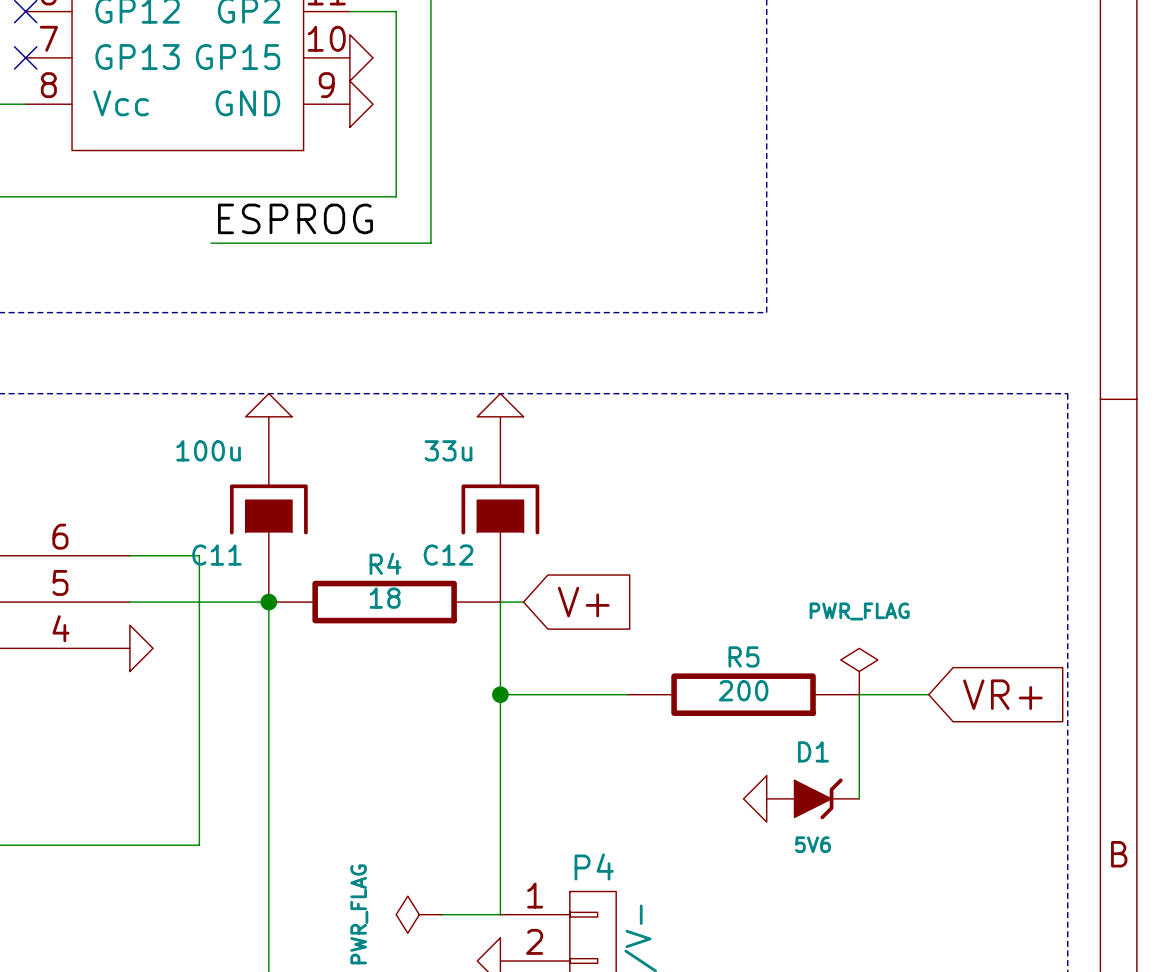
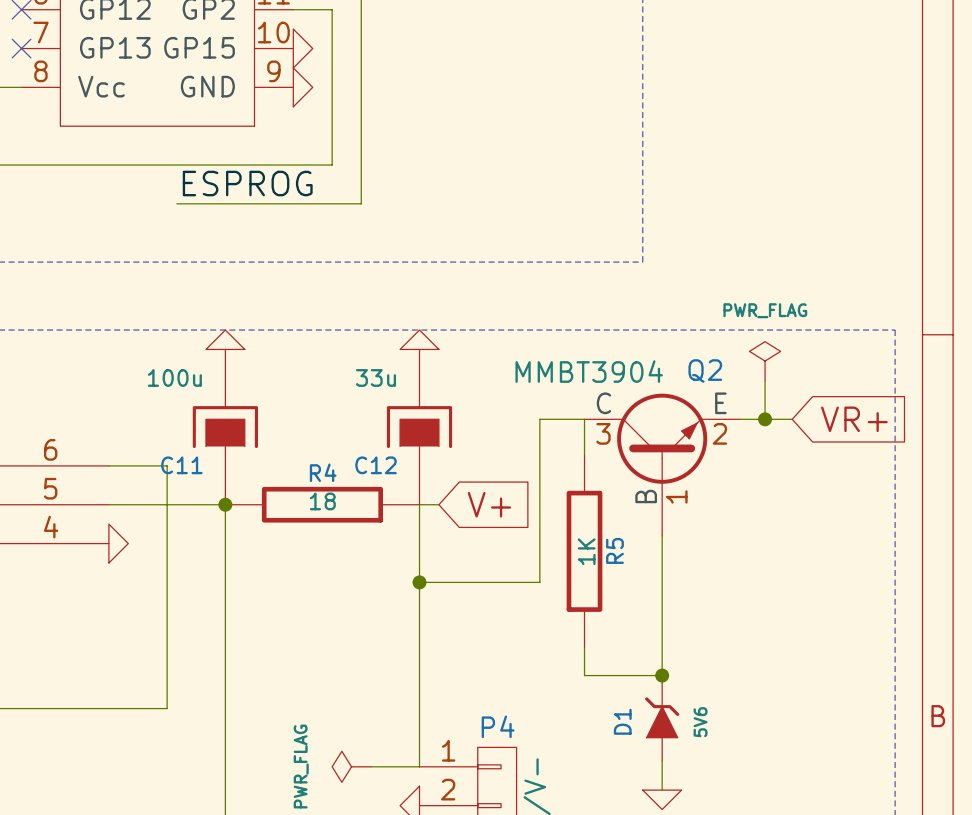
wire: none -> (765, 380) (765, 419)
wire: none -> (739, 419) (792, 419)
junction: none -> (765, 419)
wire: none -> (584, 454) (584, 419) (539, 419) (539, 582) (526, 582)
Q2: none -> MMBT3904 (662, 464)
wire: none -> (662, 535) (662, 683)
power symbol position: PWR_FLAG (859, 671) -> PWR_FLAG (765, 361)
R5 value: 200 (743, 690) -> 1K (586, 551)
R5 rotation: 0° (743, 694) -> 90° clockwise (584, 551)
wire: (928, 694) (859, 694) (859, 798) -> none
global label position: VR+ (1002, 694) -> VR+ (854, 419)
wire: none -> (584, 648) (584, 675) (662, 675)
power symbol rotation: 0° (755, 798) -> 90° counterclockwise (662, 799)
power symbol position: (755, 798) -> (662, 799)
D1 position: (813, 798) -> (662, 722)
D1 rotation: 0° (818, 798) -> 90° counterclockwise (662, 717)
junction: none -> (662, 675)
wire: none -> (662, 760) (662, 790)

